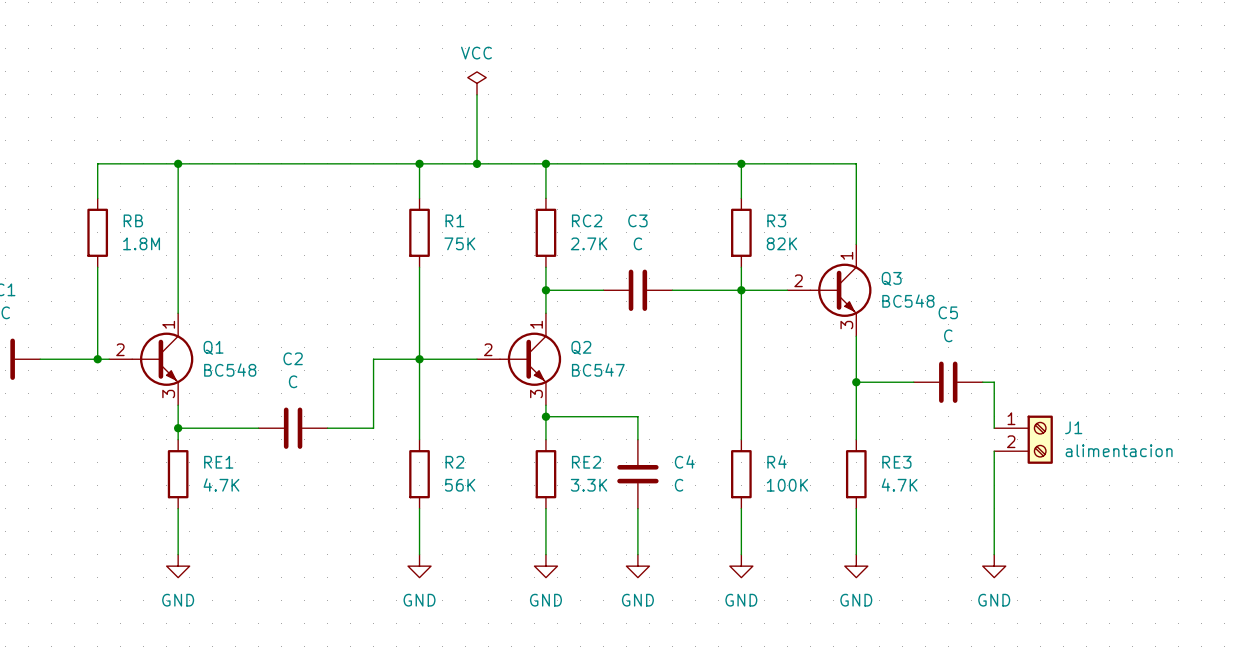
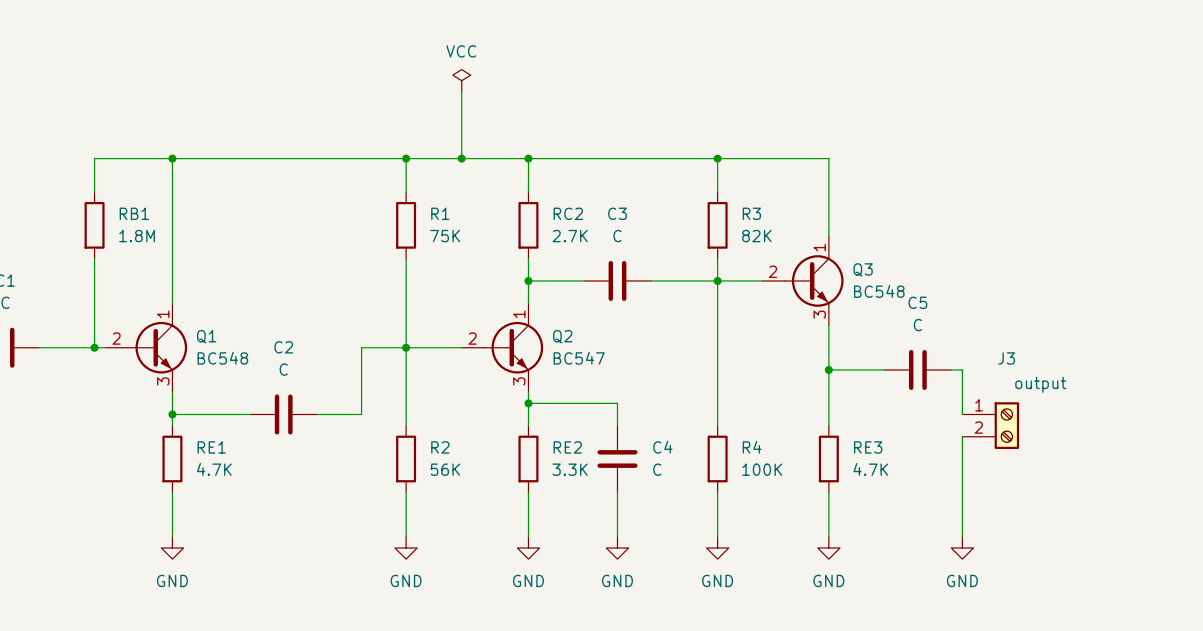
RB name: RB (133, 220) -> RB1 (134, 213)
J1 name: J1 (1073, 427) -> J3 (1006, 358)
J1 value: alimentacion (1119, 450) -> output (1040, 384)

